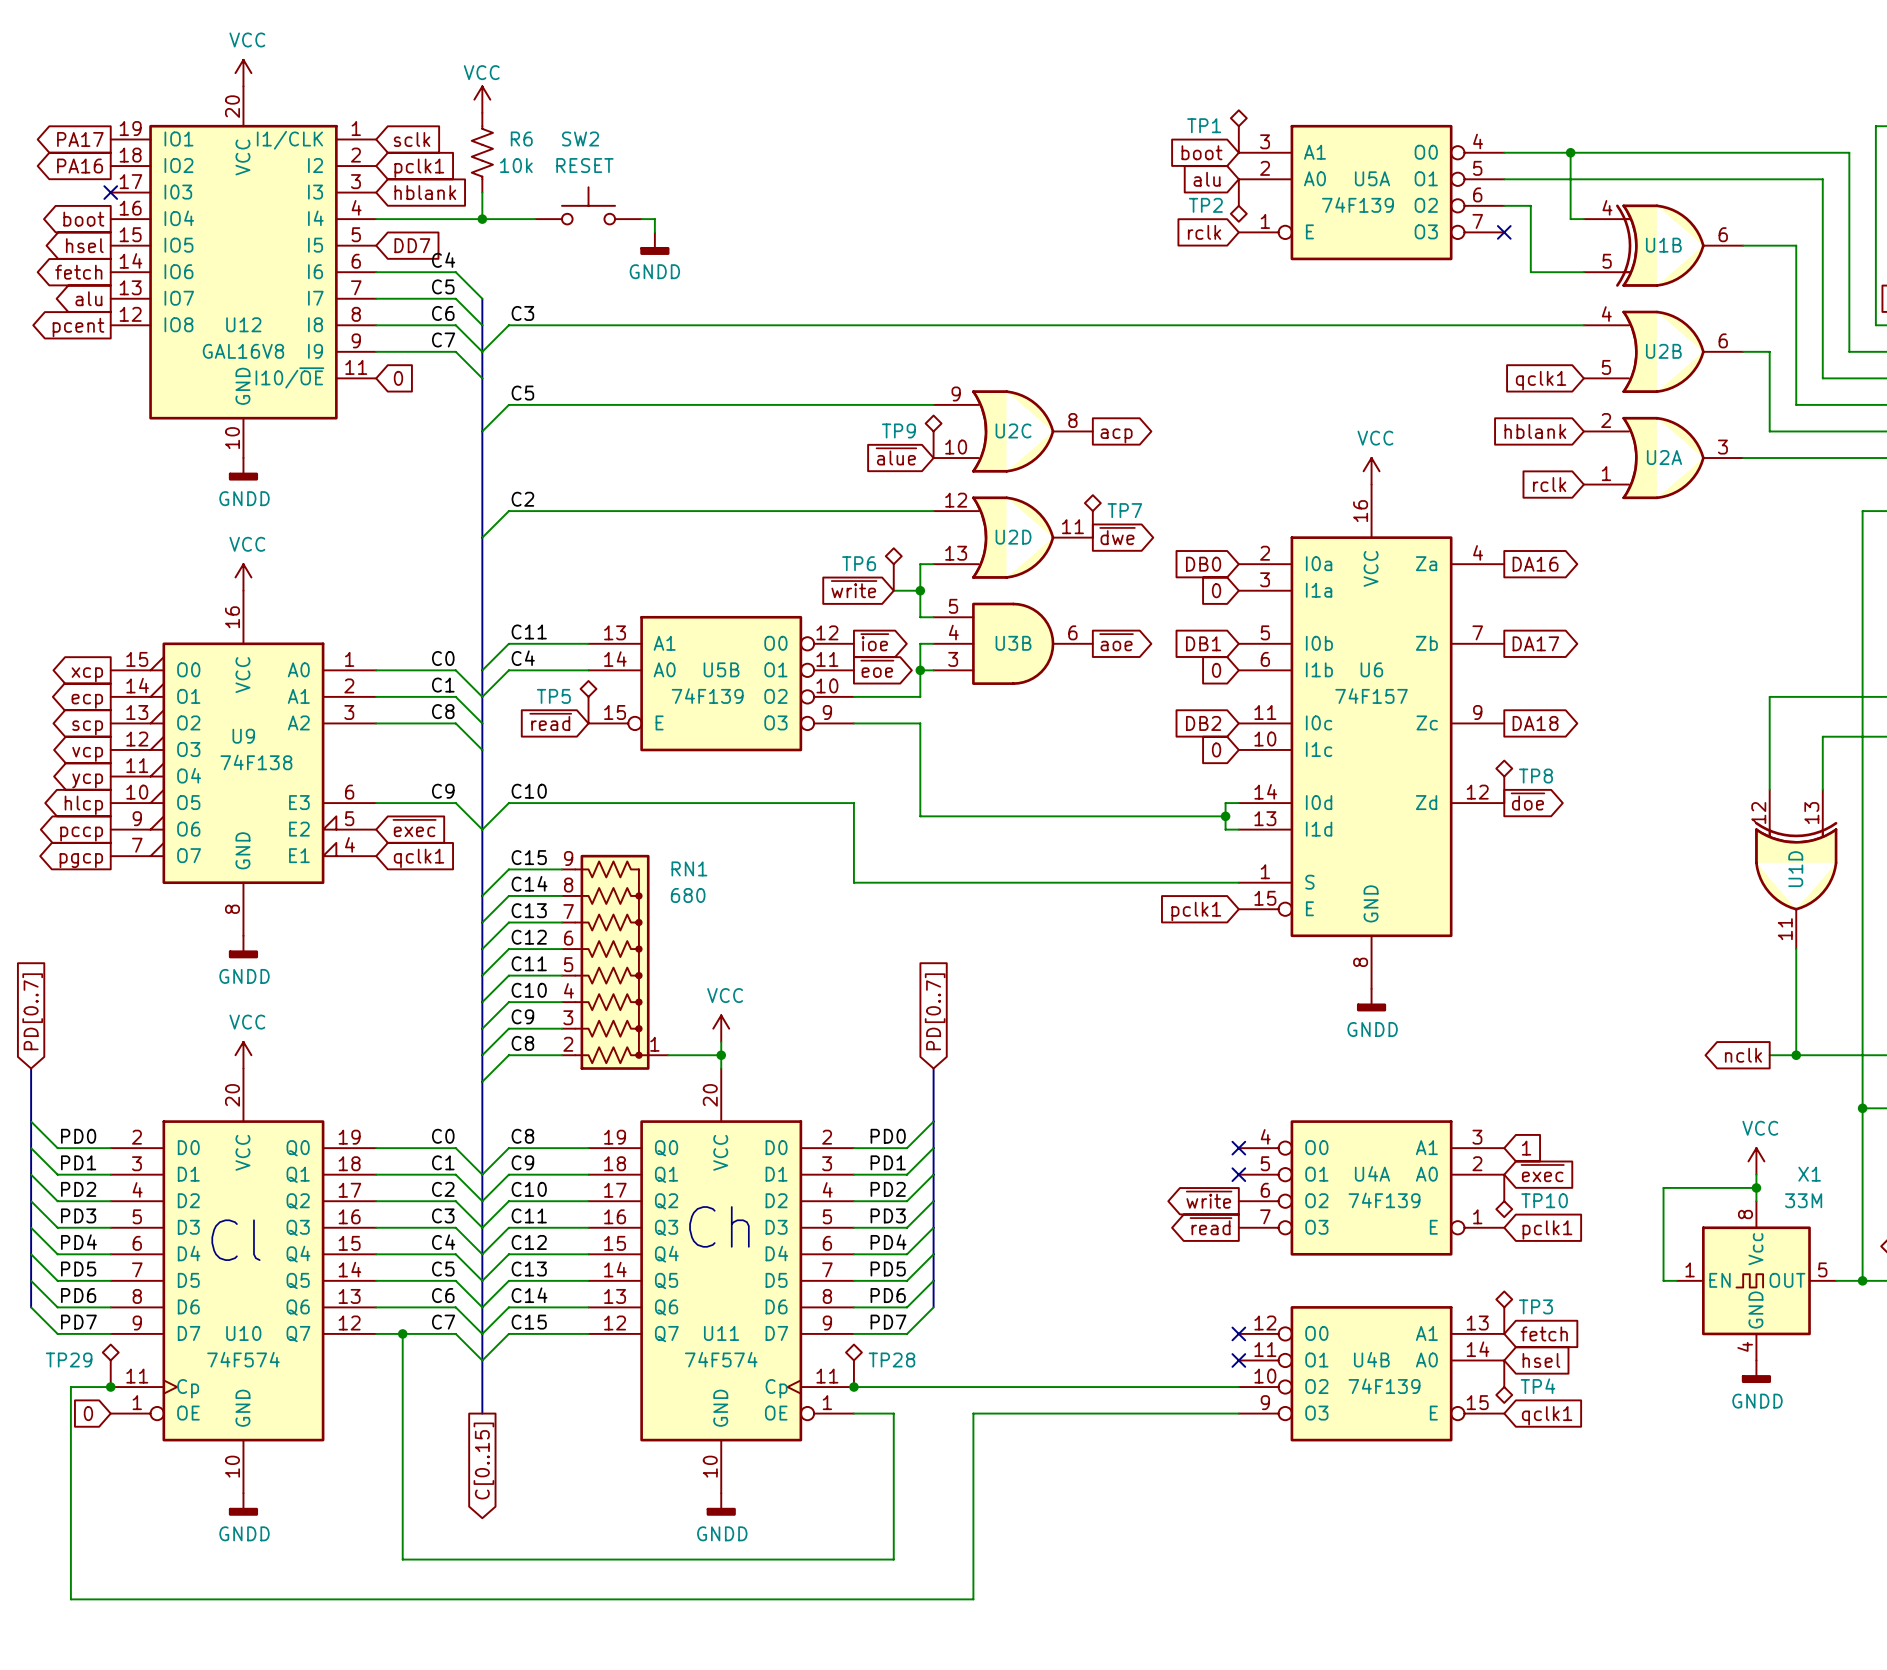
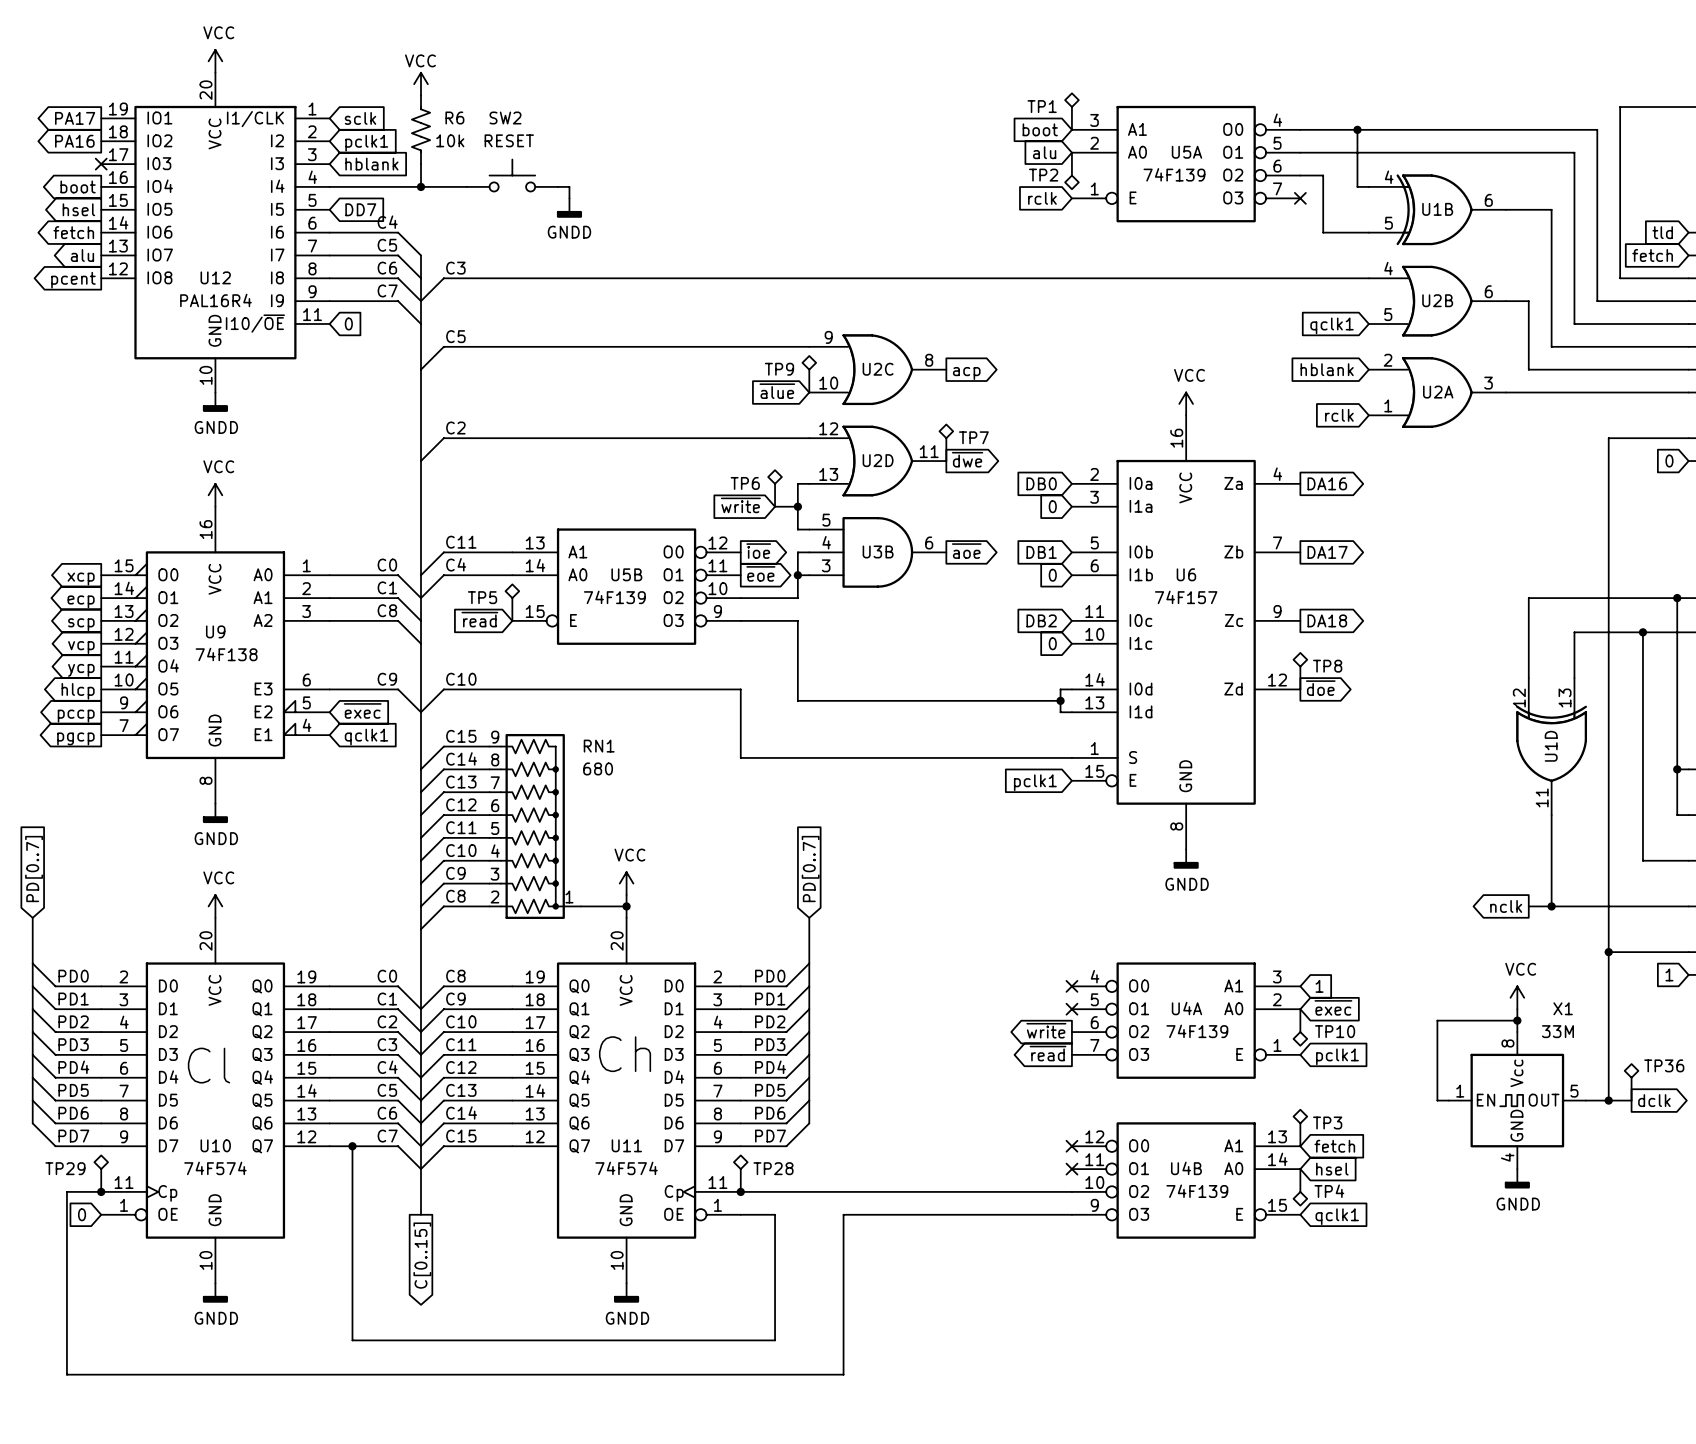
U12 value: GAL16V8 (243, 351) -> PAL16R4 (215, 300)

